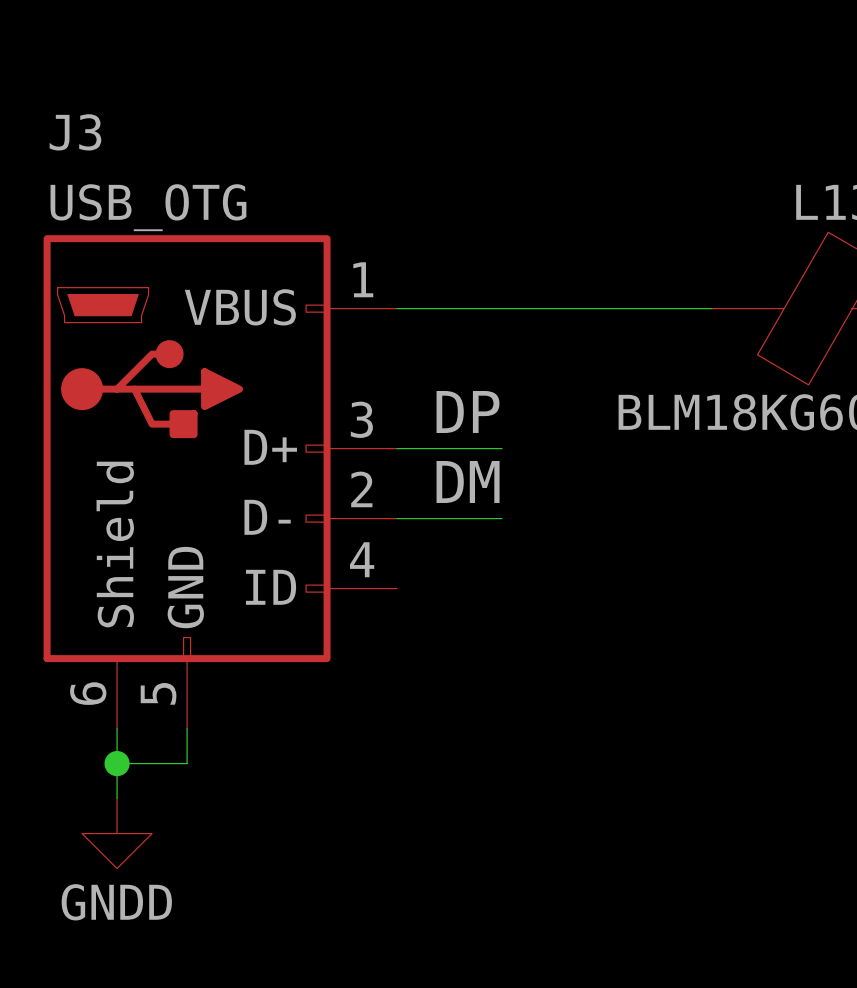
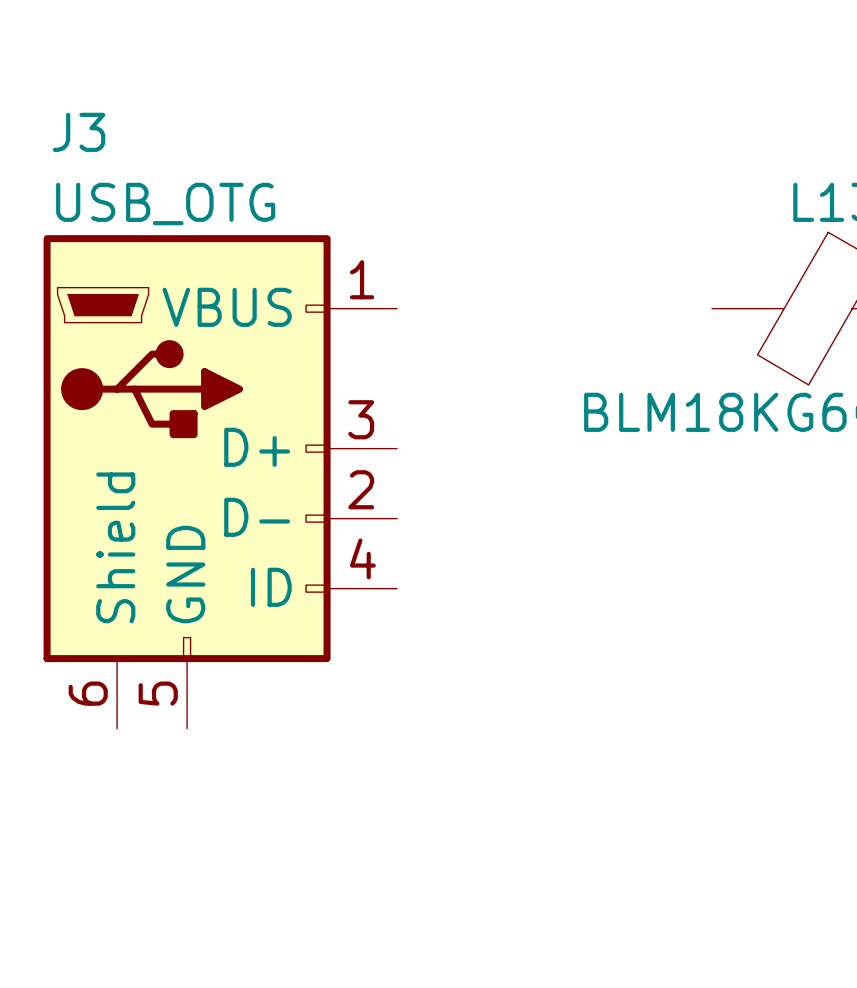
wire: (397, 308) (712, 308) -> none
label: DP (468, 411) -> none
wire: (397, 448) (502, 448) -> none
label: DM (468, 481) -> none
wire: (397, 518) (502, 518) -> none
wire: (117, 728) (117, 798) -> none
wire: (187, 728) (187, 763) (117, 763) -> none
junction: (117, 763) -> none
power symbol: GNDD (117, 833) -> none

